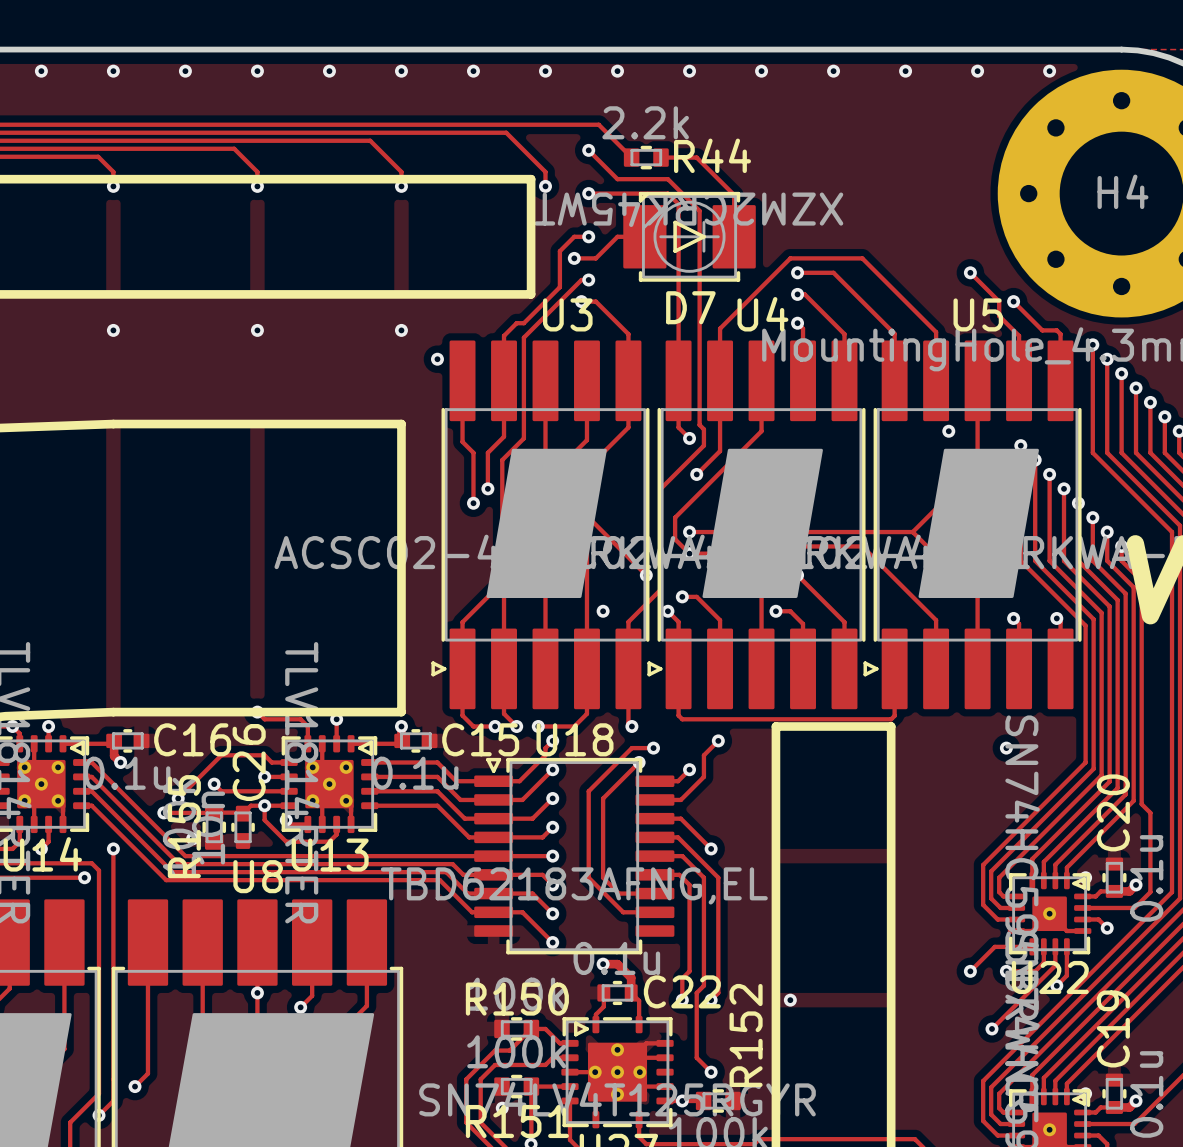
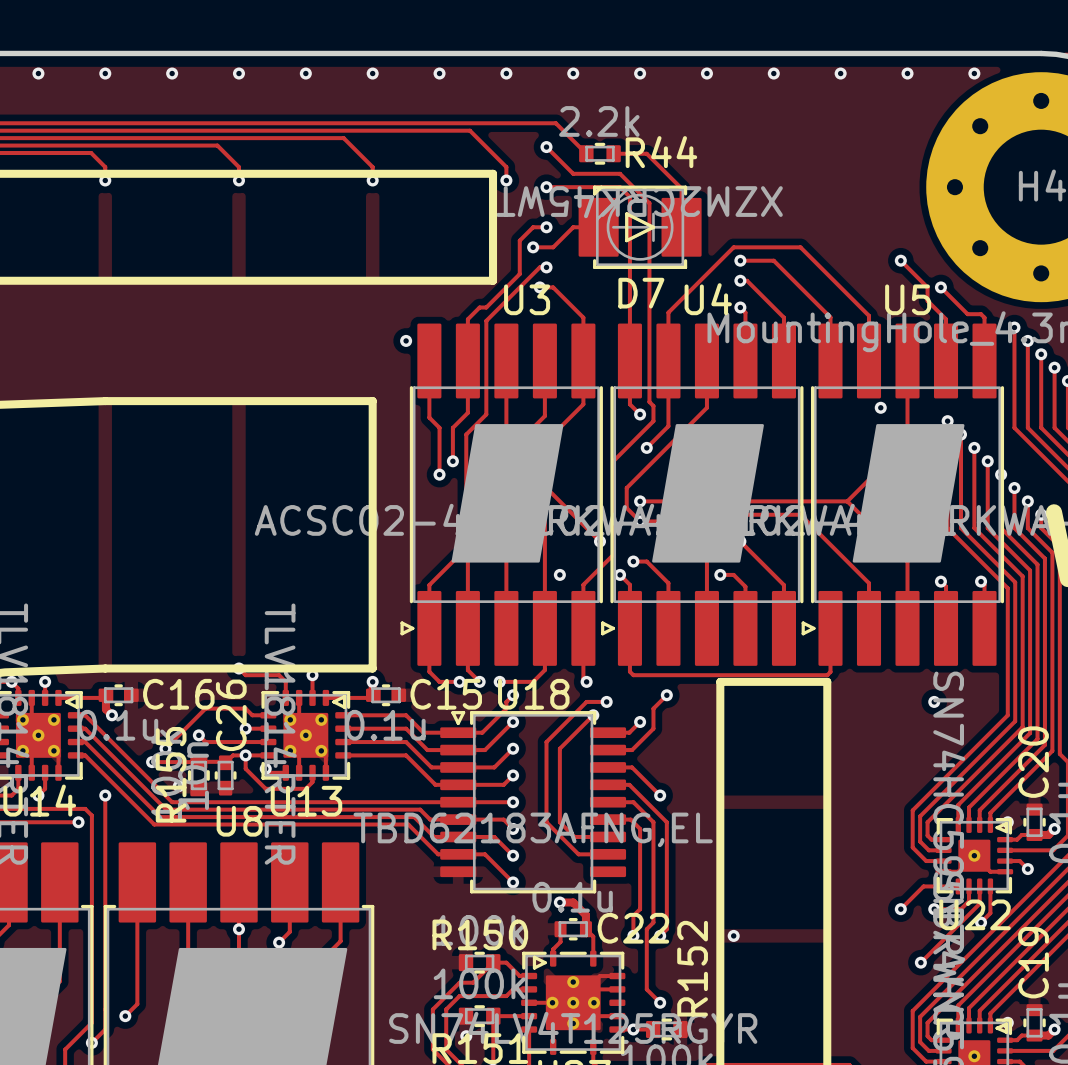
via: (113, 330) -> none
via: (257, 330) -> none
via: (401, 330) -> none

